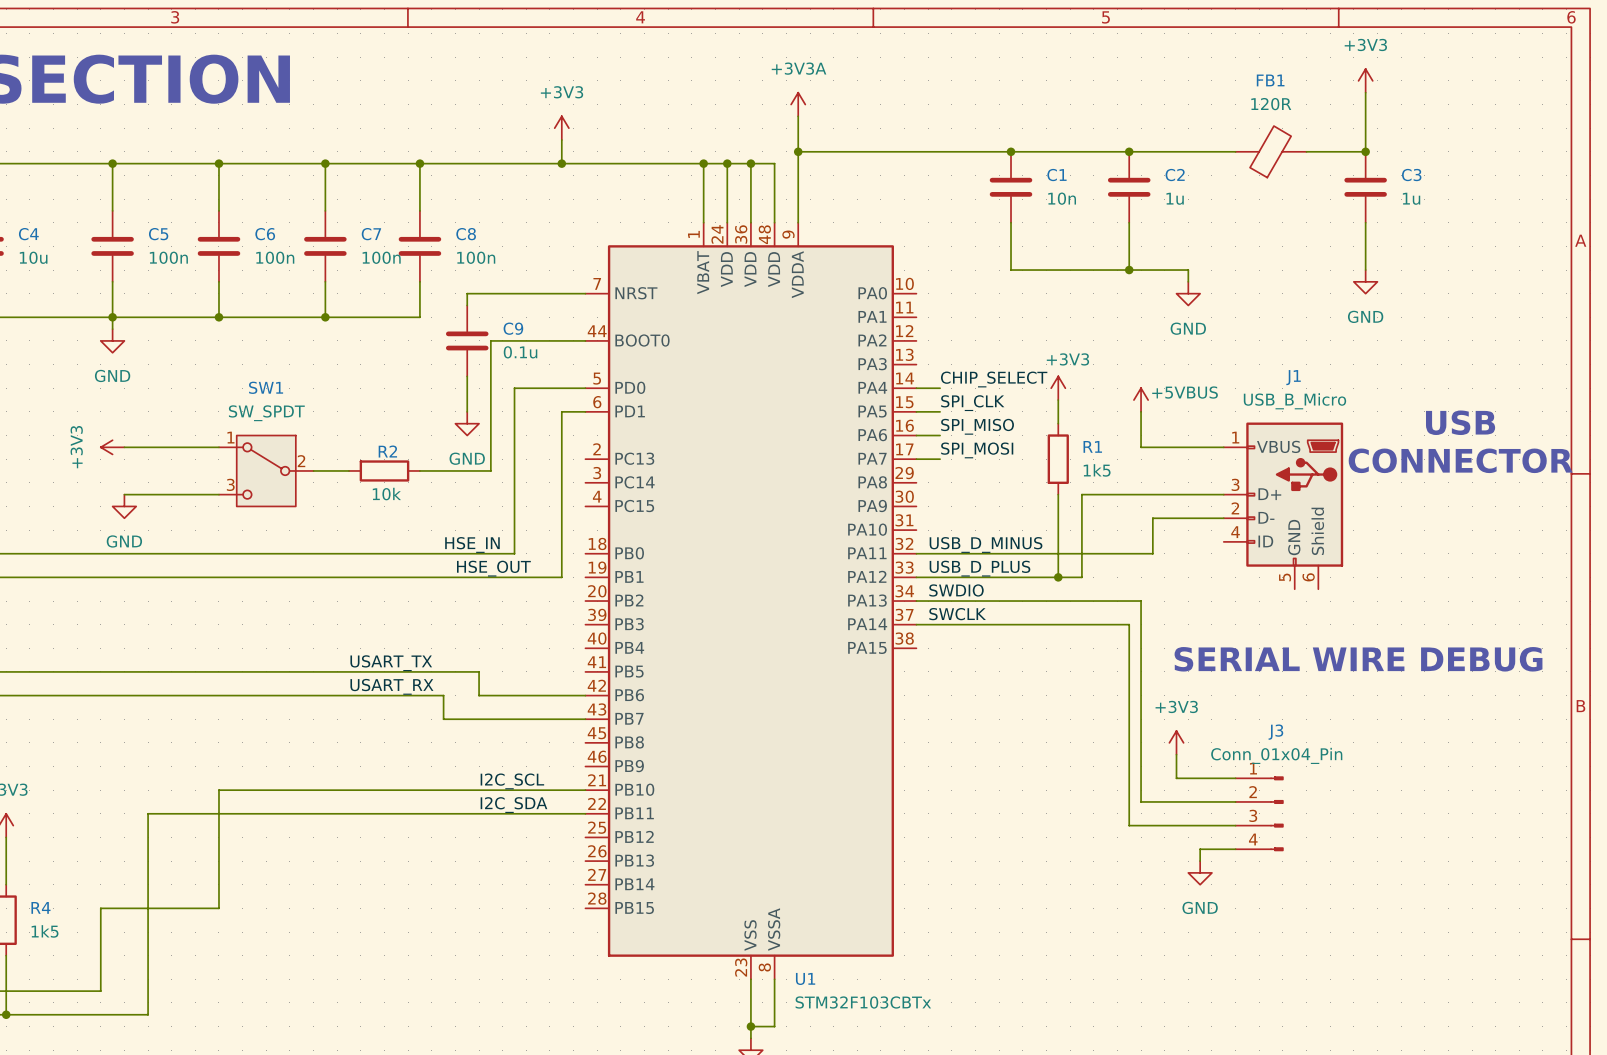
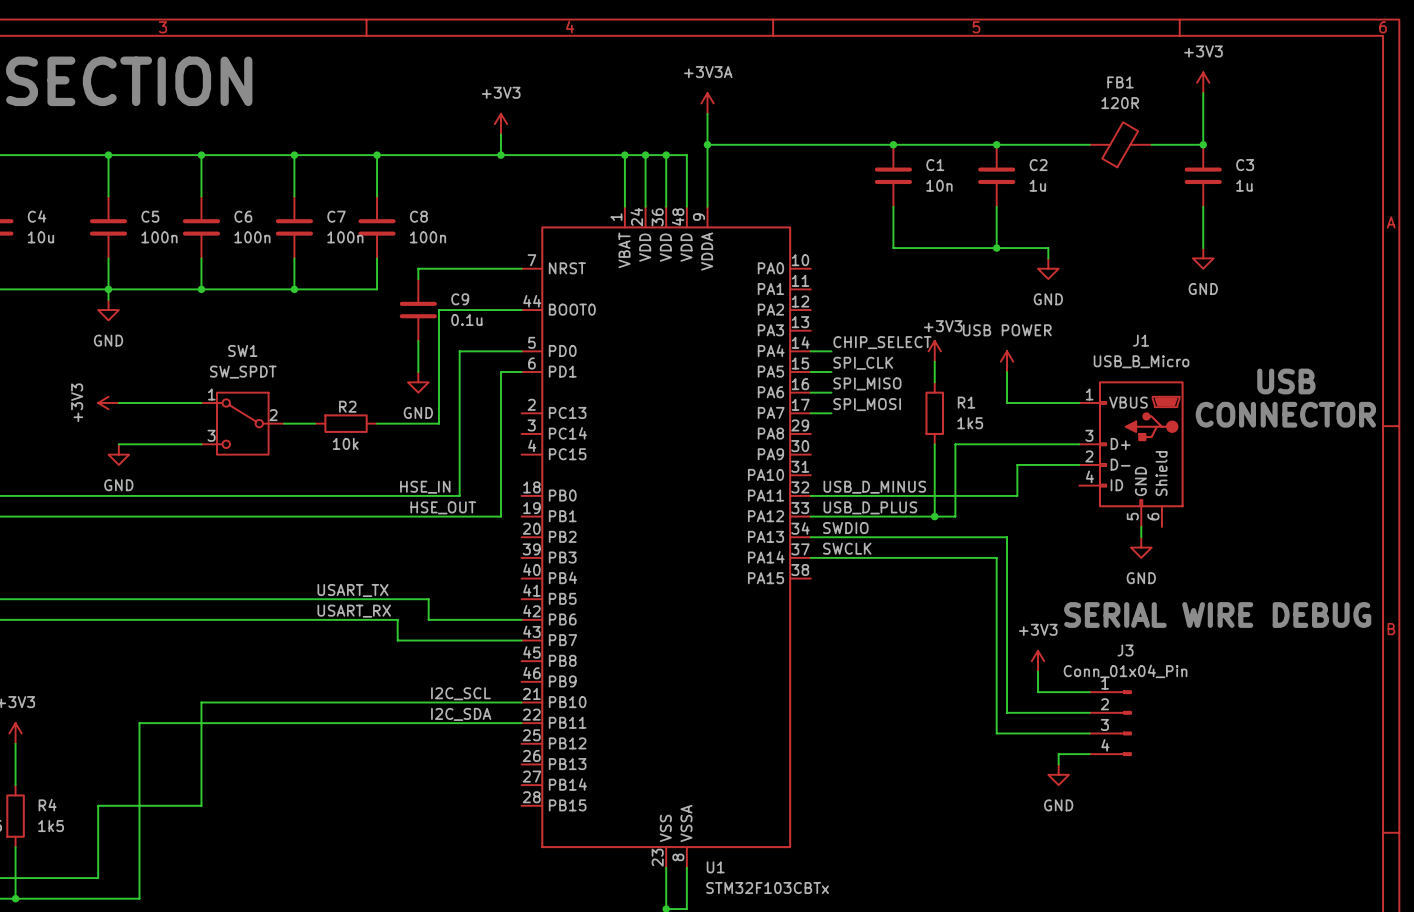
power symbol: +5VBUS (1141, 400) -> USB POWER (1007, 361)
wire: none -> (1141, 526) (1141, 537)
power symbol: none -> GND (1141, 547)
text position: SERIAL WIRE DEBUG (1358, 659) -> SERIAL WIRE DEBUG (1217, 615)

